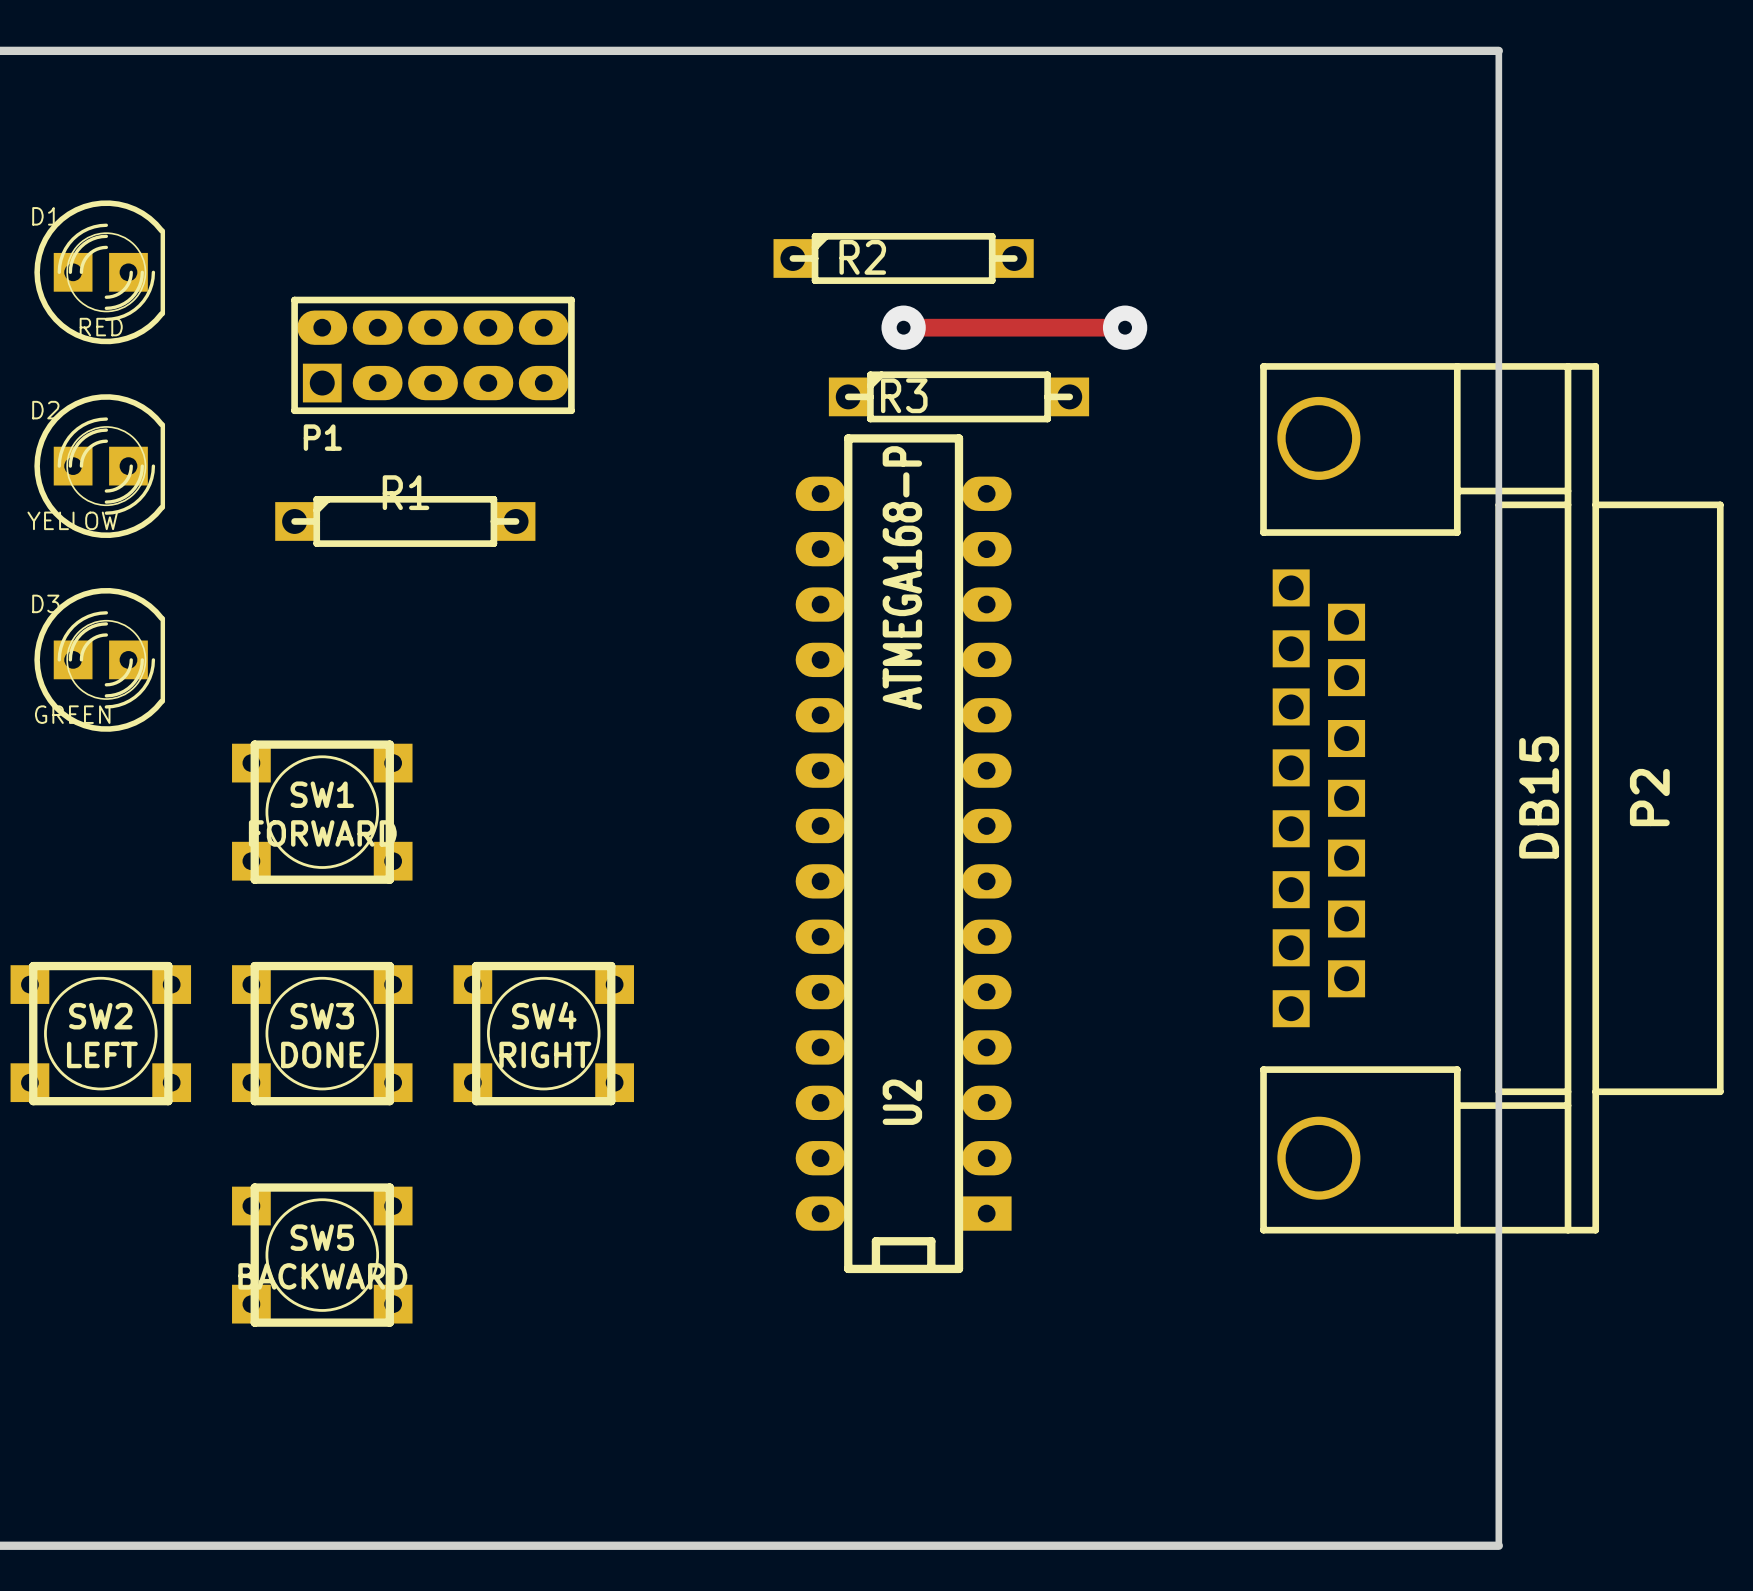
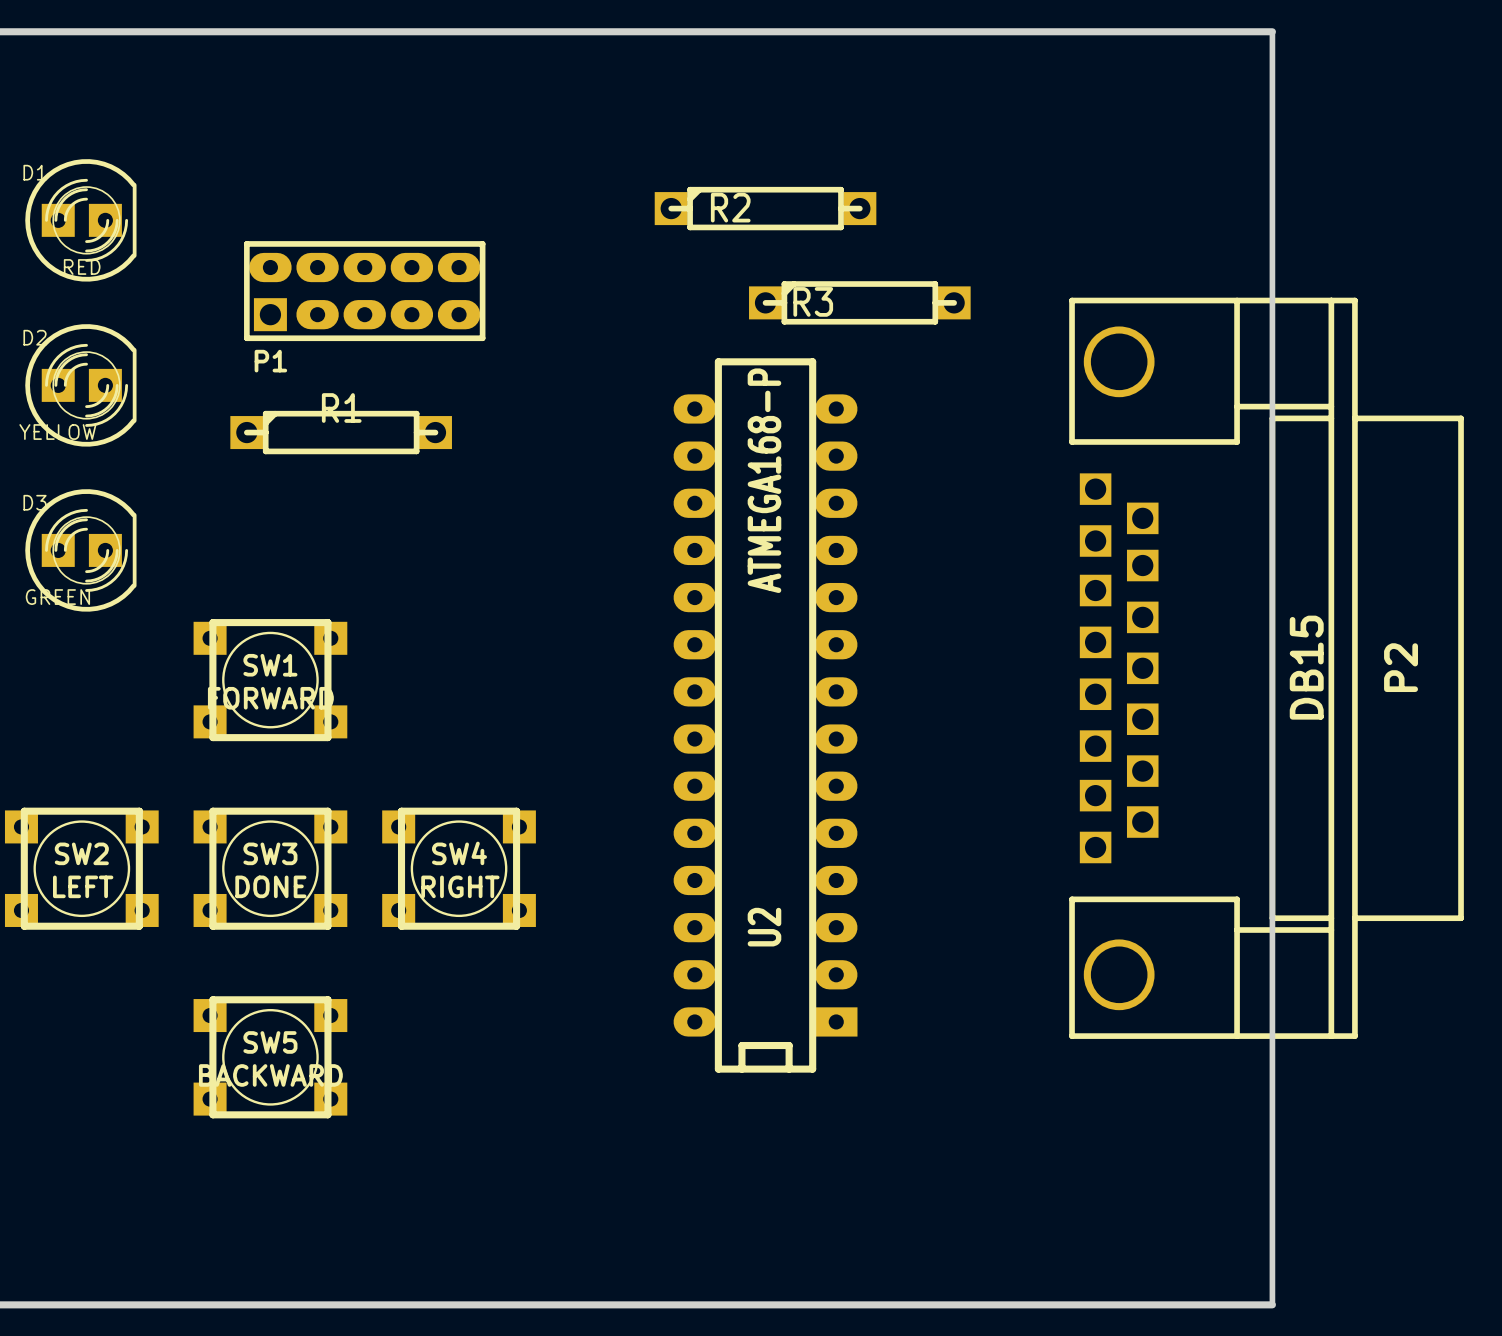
track: (903, 327) (1125, 327) -> none
via: (903, 327) -> none
via: (1125, 327) -> none
R3 position: (958, 396) -> (859, 302)

